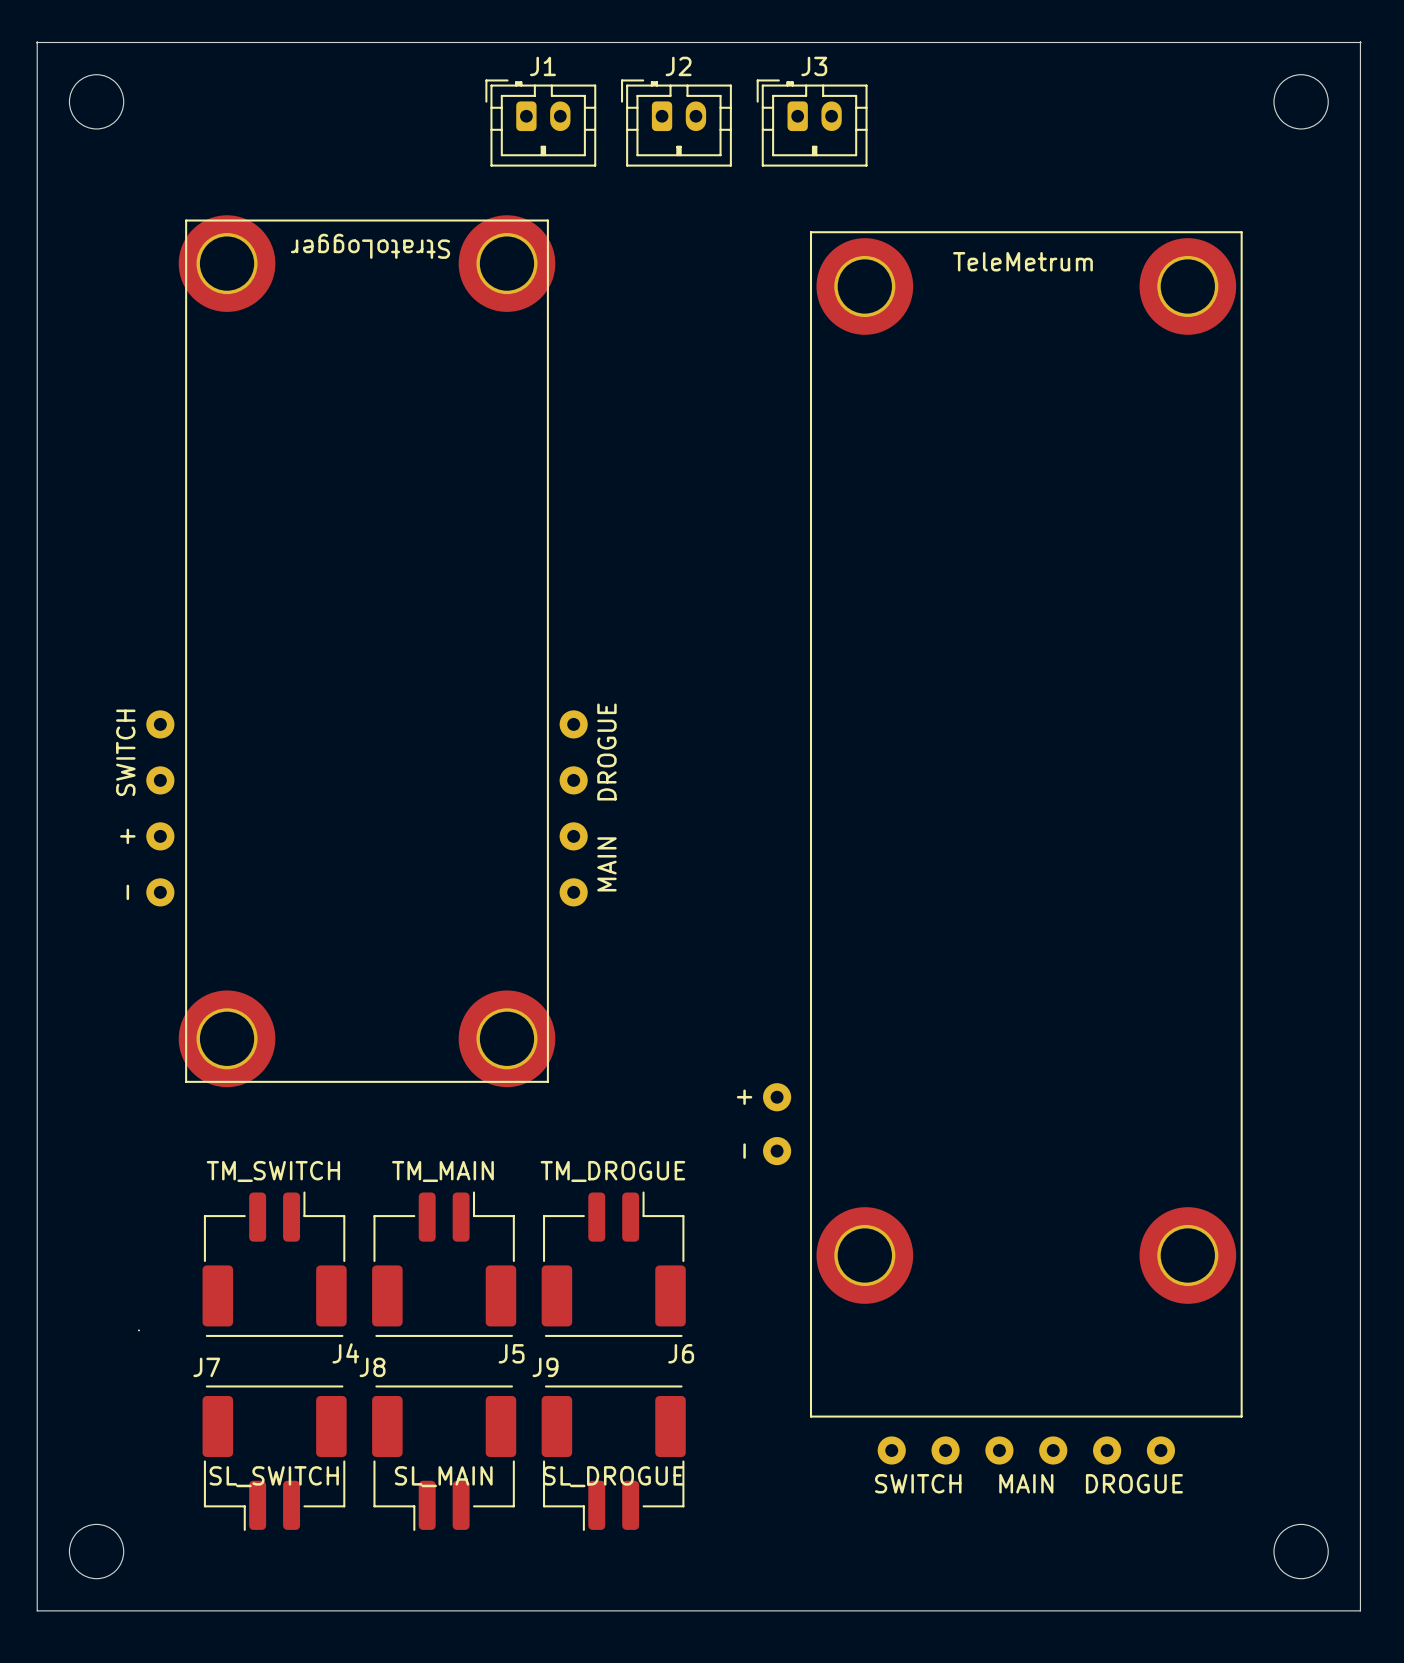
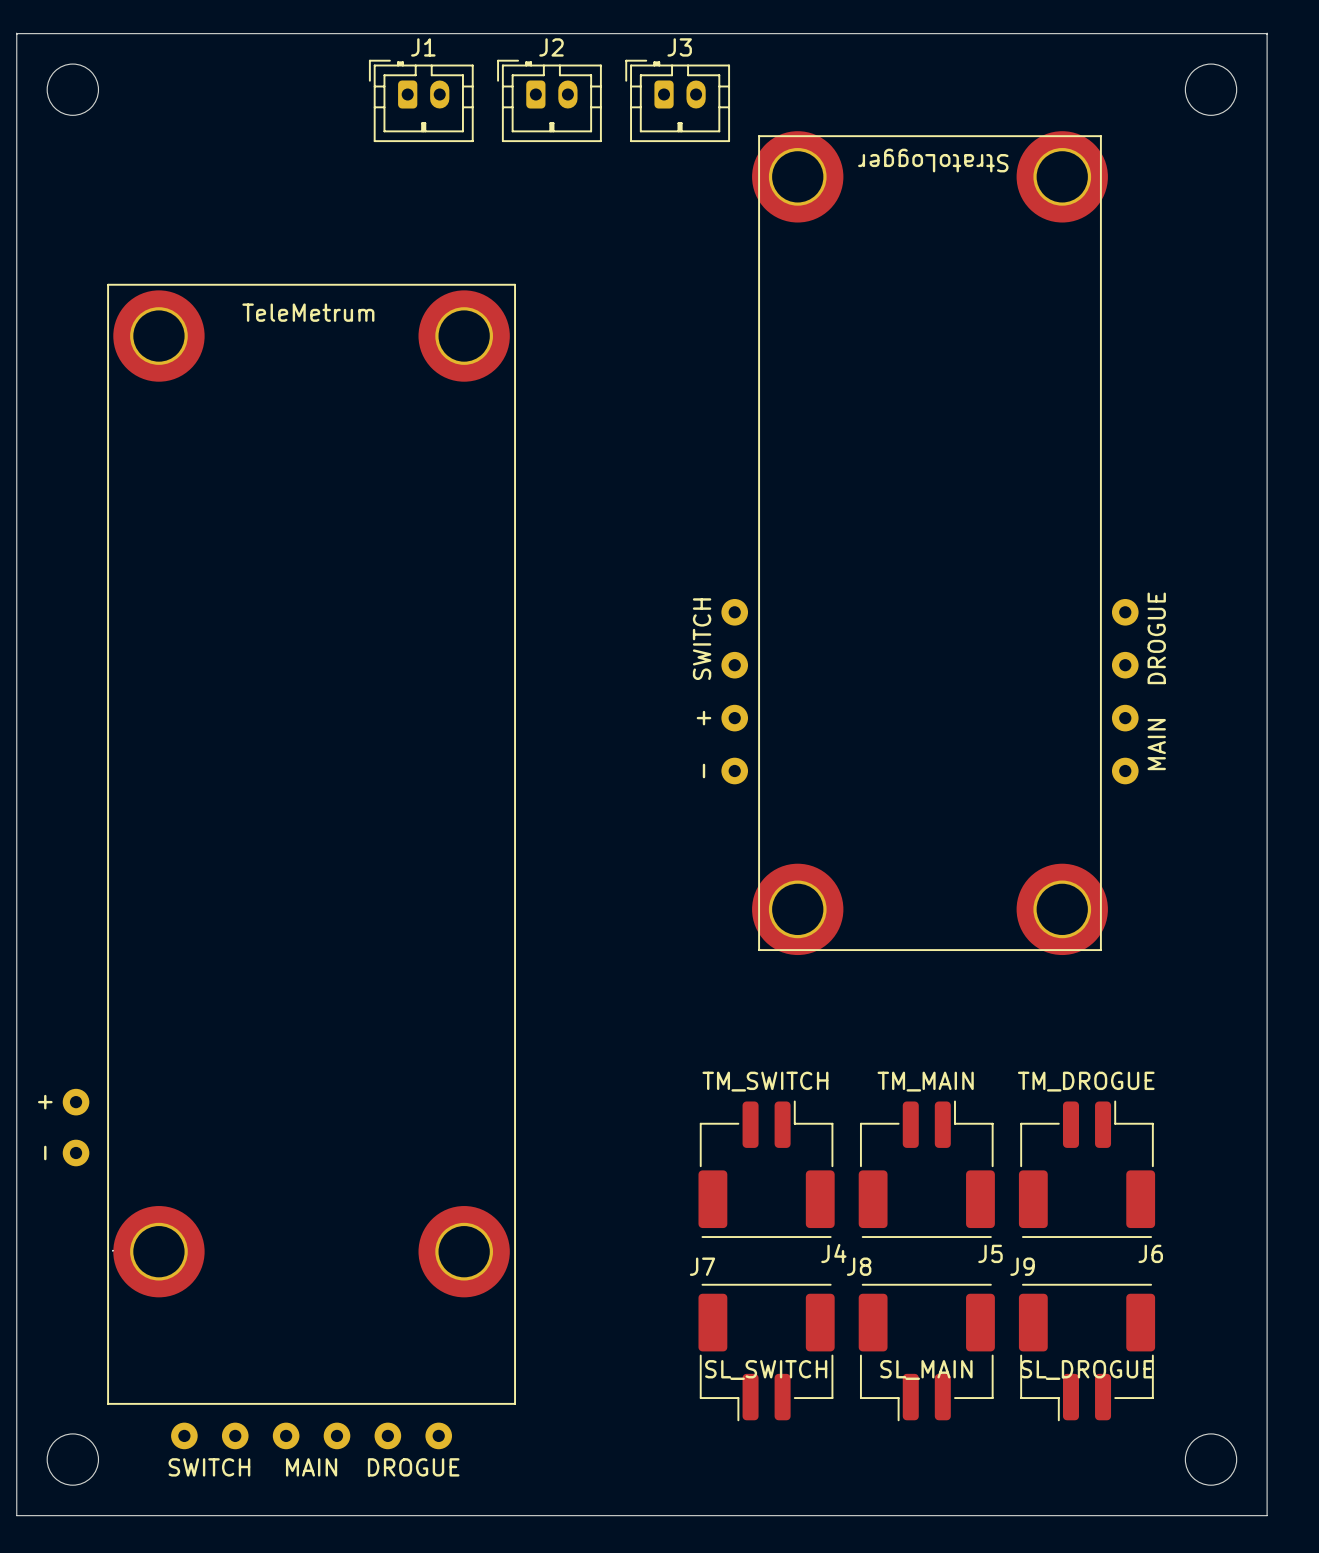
J1 position: (540, 123) -> (421, 100)
J2 position: (676, 123) -> (549, 100)
J3 position: (812, 123) -> (677, 100)
part: none -> StratoLogger (930, 543)
part: StratoLogger (367, 651) -> none
part: TeleMetrum (1002, 847) -> none
part: none -> TeleMetrum (289, 866)
text: none -> TM_SWITCH (765, 1081)
text: none -> TM_MAIN (925, 1081)
text: none -> TM_DROGUE (1086, 1081)
text: TM_SWITCH (273, 1171) -> none
text: TM_MAIN (442, 1171) -> none
text: TM_DROGUE (612, 1171) -> none
J4 position: (274, 1264) -> (766, 1169)
J5 position: (444, 1264) -> (926, 1169)
J6 position: (613, 1264) -> (1087, 1169)
text: none -> SL_SWITCH (766, 1370)
text: none -> SL_MAIN (926, 1370)
text: none -> SL_DROGUE (1087, 1370)
J7 position: (274, 1458) -> (766, 1352)
J8 position: (444, 1458) -> (926, 1352)
J9 position: (613, 1458) -> (1087, 1352)
text: SL_SWITCH (274, 1476) -> none
text: SL_MAIN (443, 1476) -> none
text: SL_DROGUE (613, 1476) -> none

